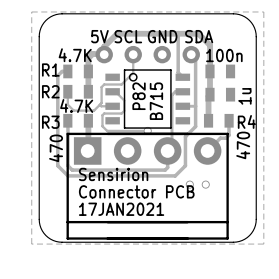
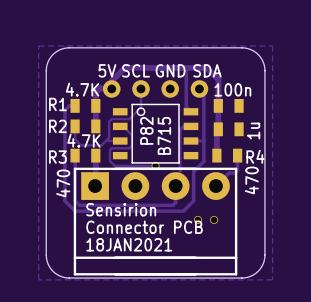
text: 17JAN2021 (121, 209) -> 18JAN2021 (129, 244)

